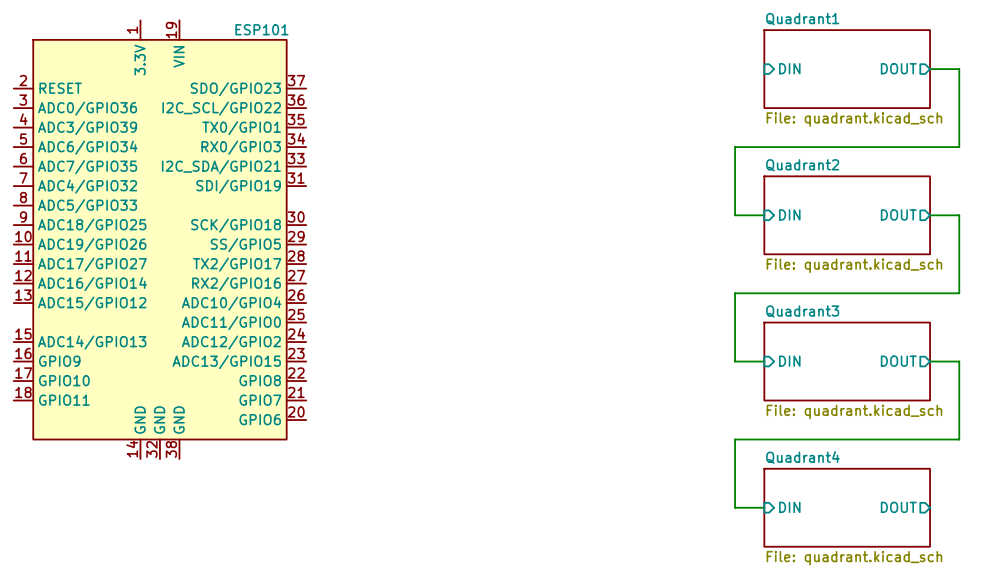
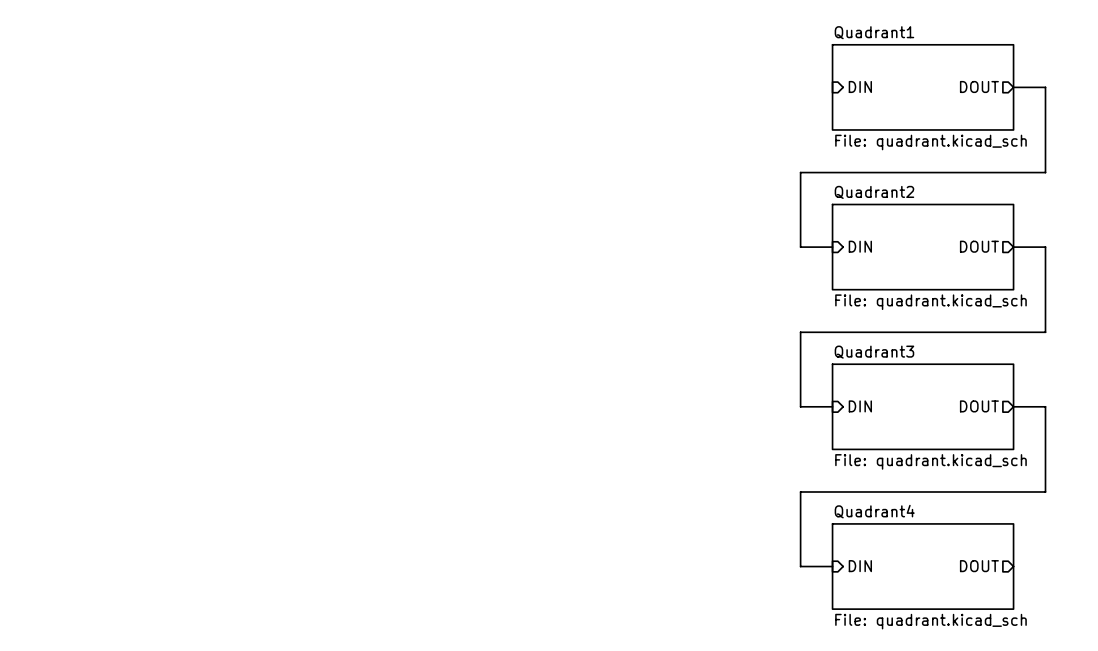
ESP101: (159, 239) -> none

